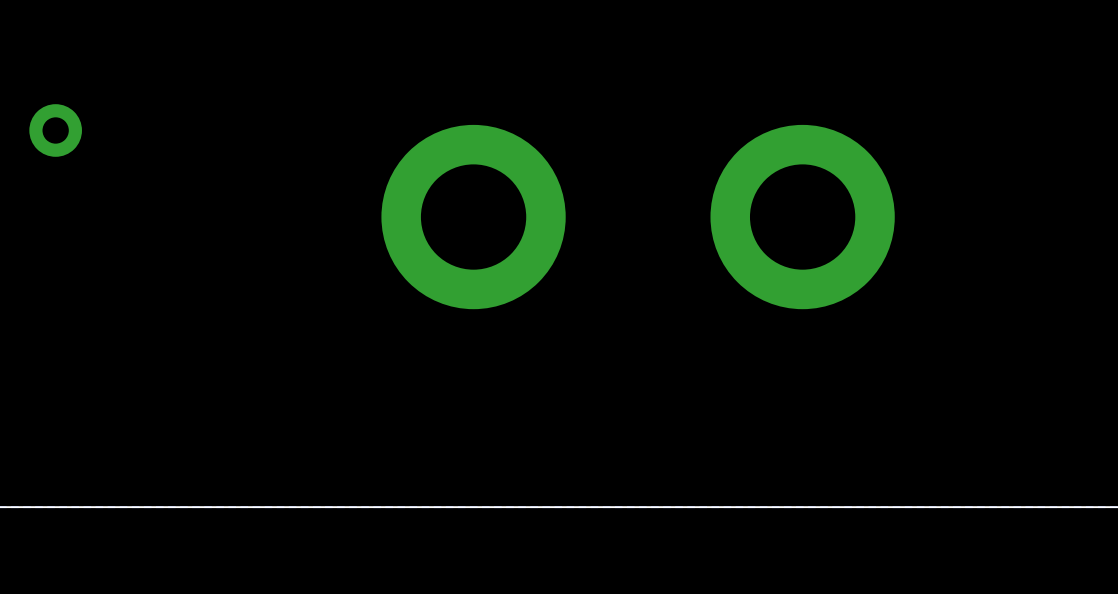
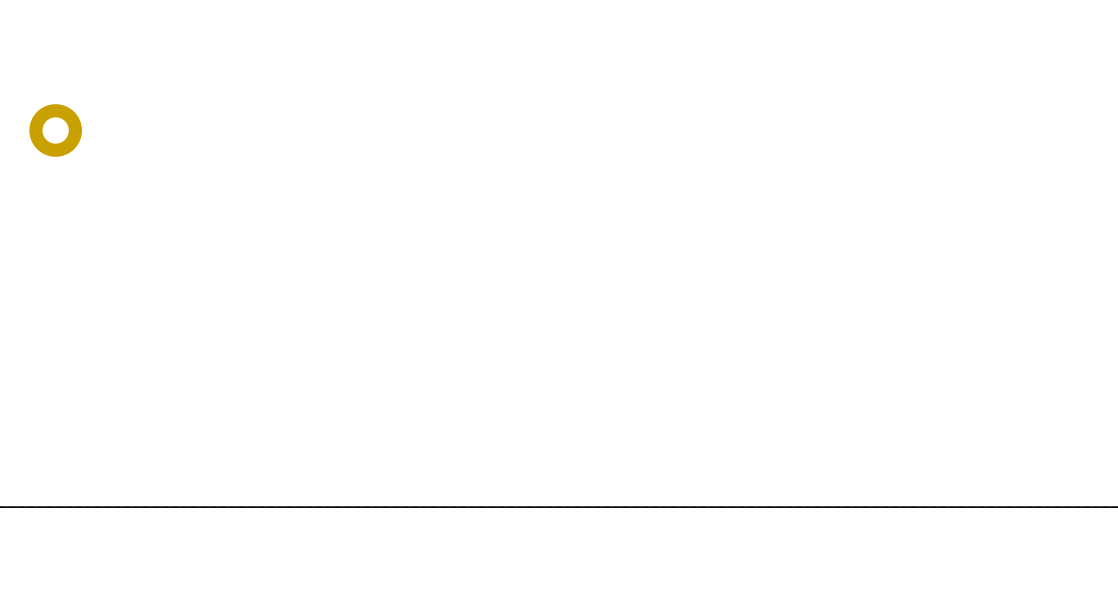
part: (473, 217) -> none
part: (802, 217) -> none

